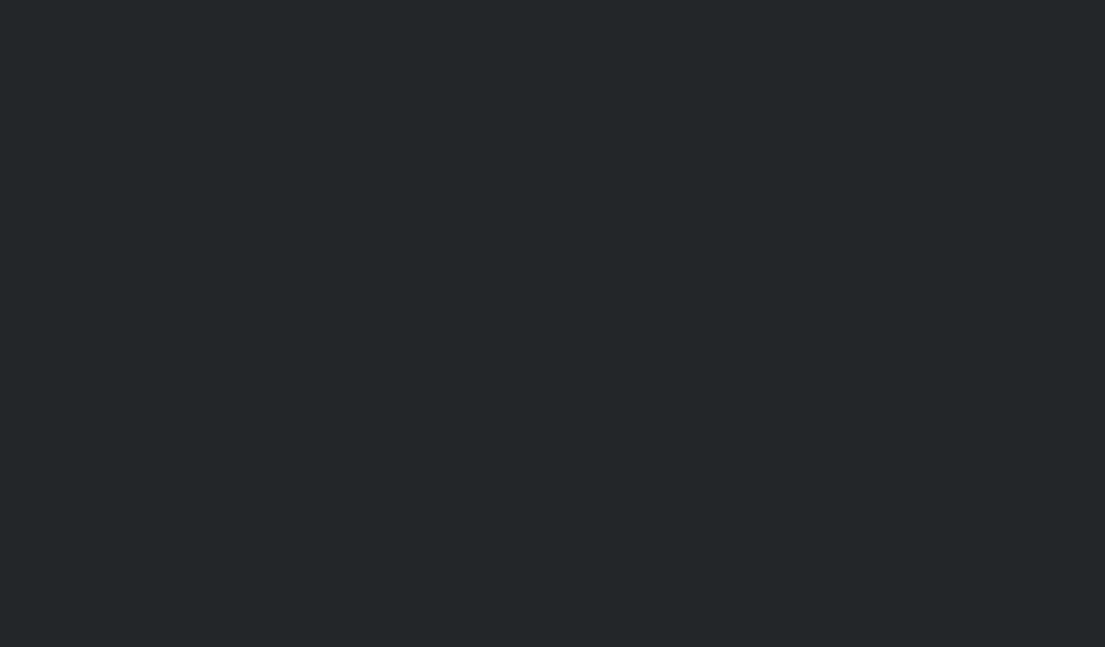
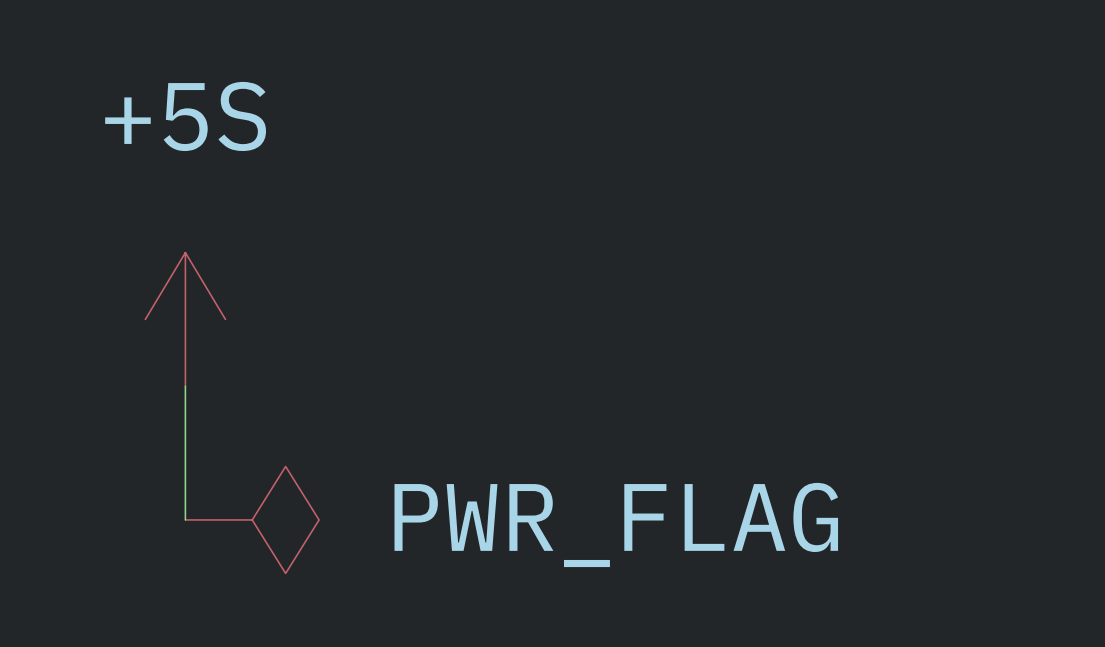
power symbol: none -> +5S (185, 319)
wire: none -> (185, 386) (185, 519)
power symbol: none -> PWR_FLAG (252, 519)

